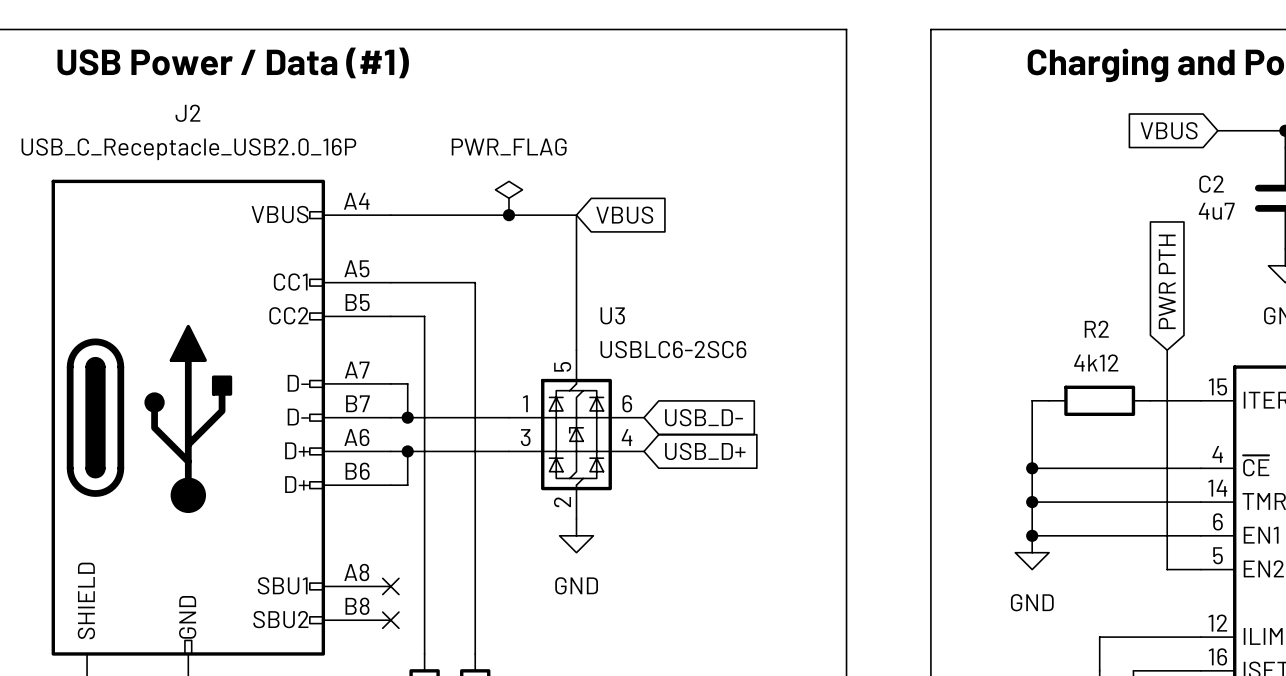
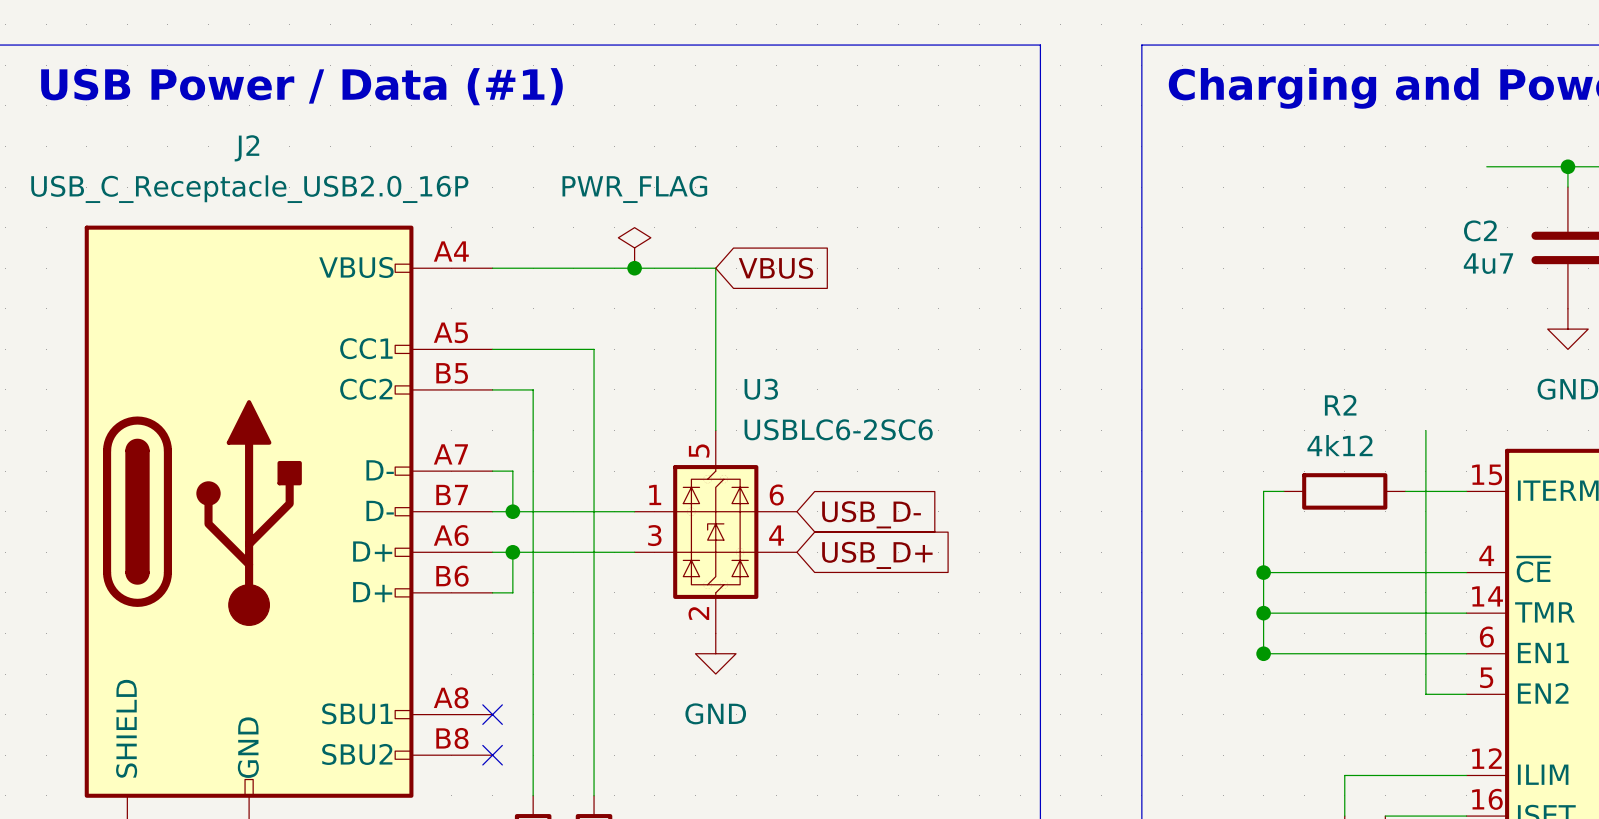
global label: VBUS (1169, 130) -> none
global label: PWR PTH (1167, 281) -> none
power symbol: GND (1032, 552) -> none

